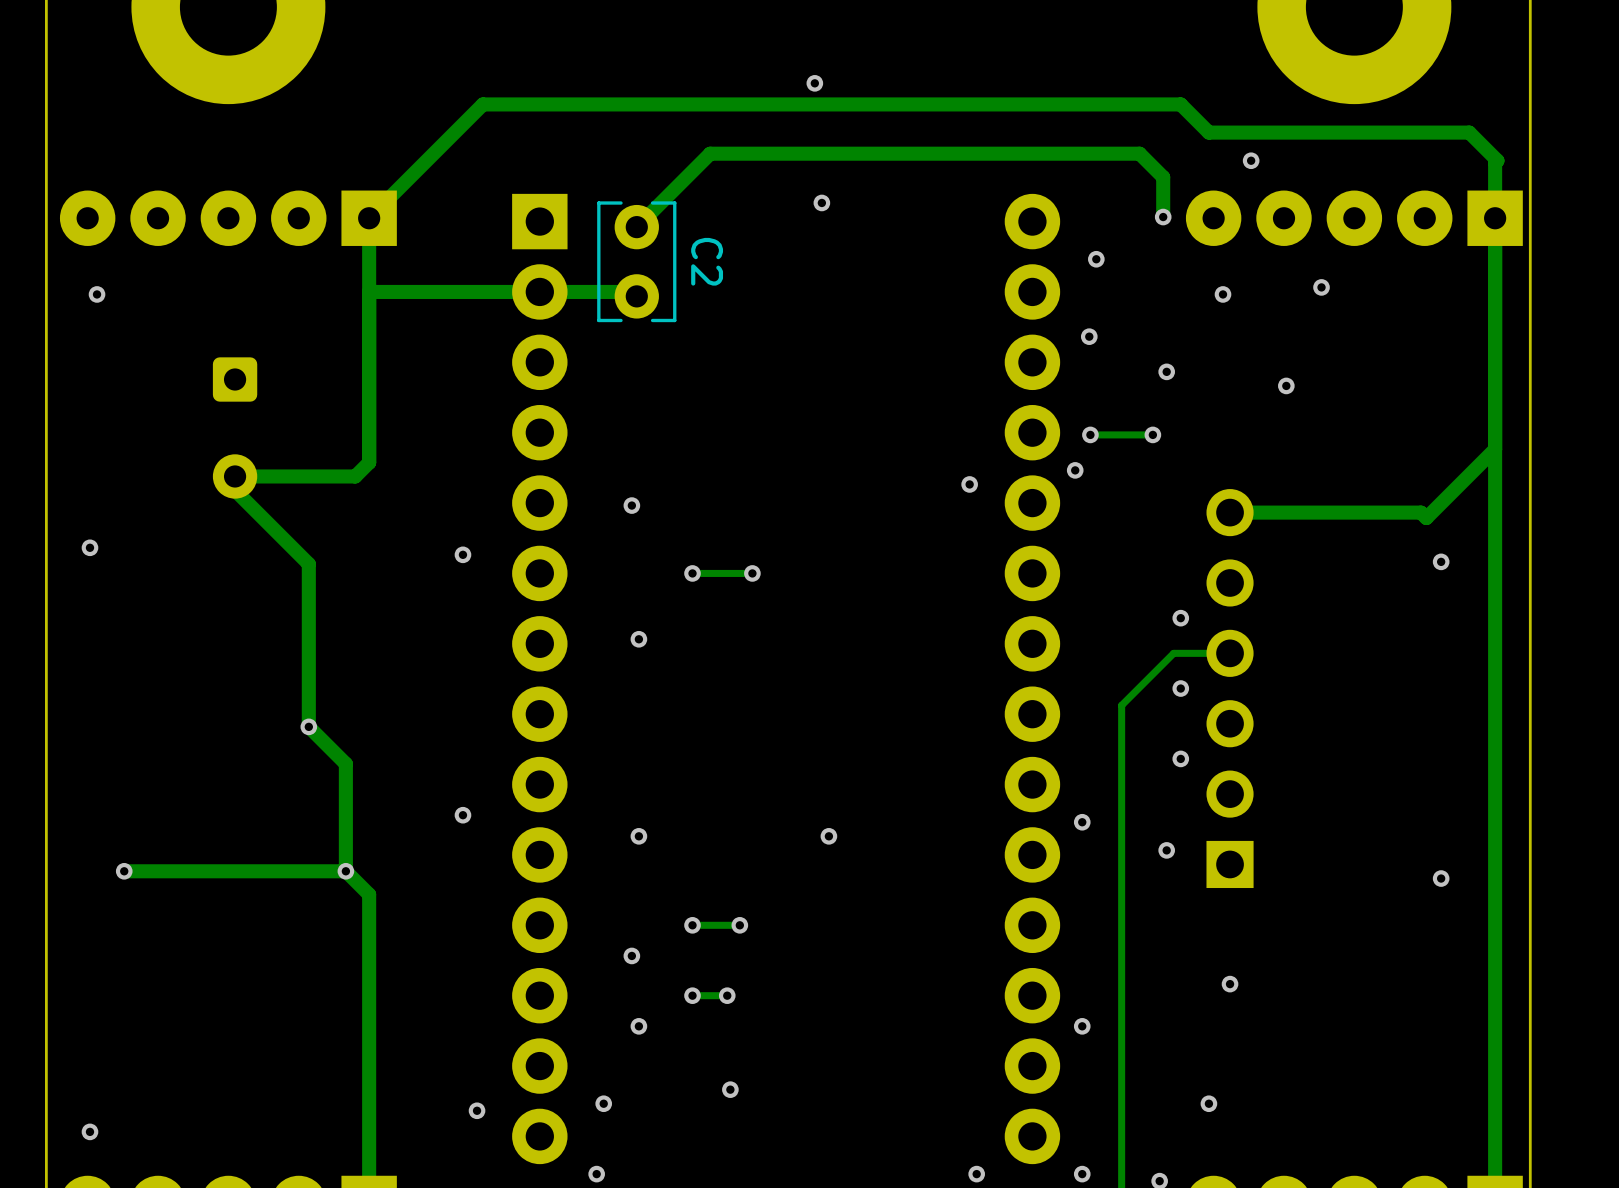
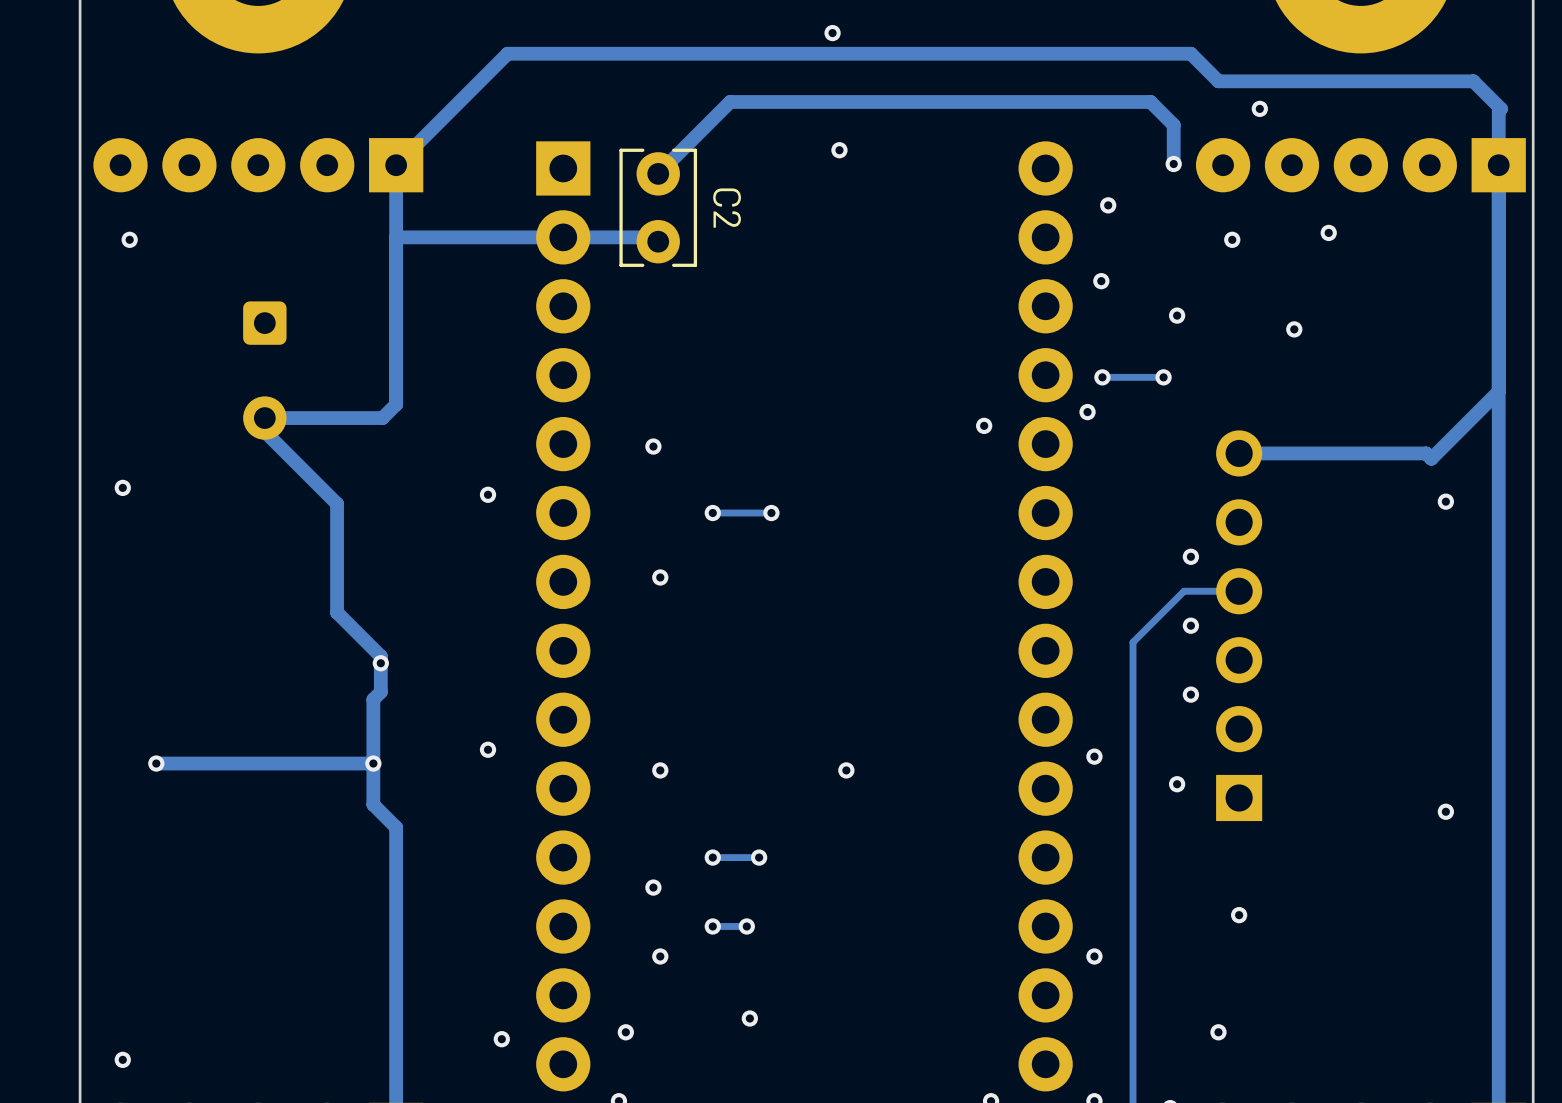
track: (308, 675) (308, 726) (345, 763) -> (337, 612) (380, 656) (380, 692) (373, 699)
via position: (308, 726) -> (380, 663)
via position: (124, 871) -> (156, 763)
track: (345, 871) (124, 871) -> (373, 763) (156, 763)
via position: (345, 871) -> (373, 763)

